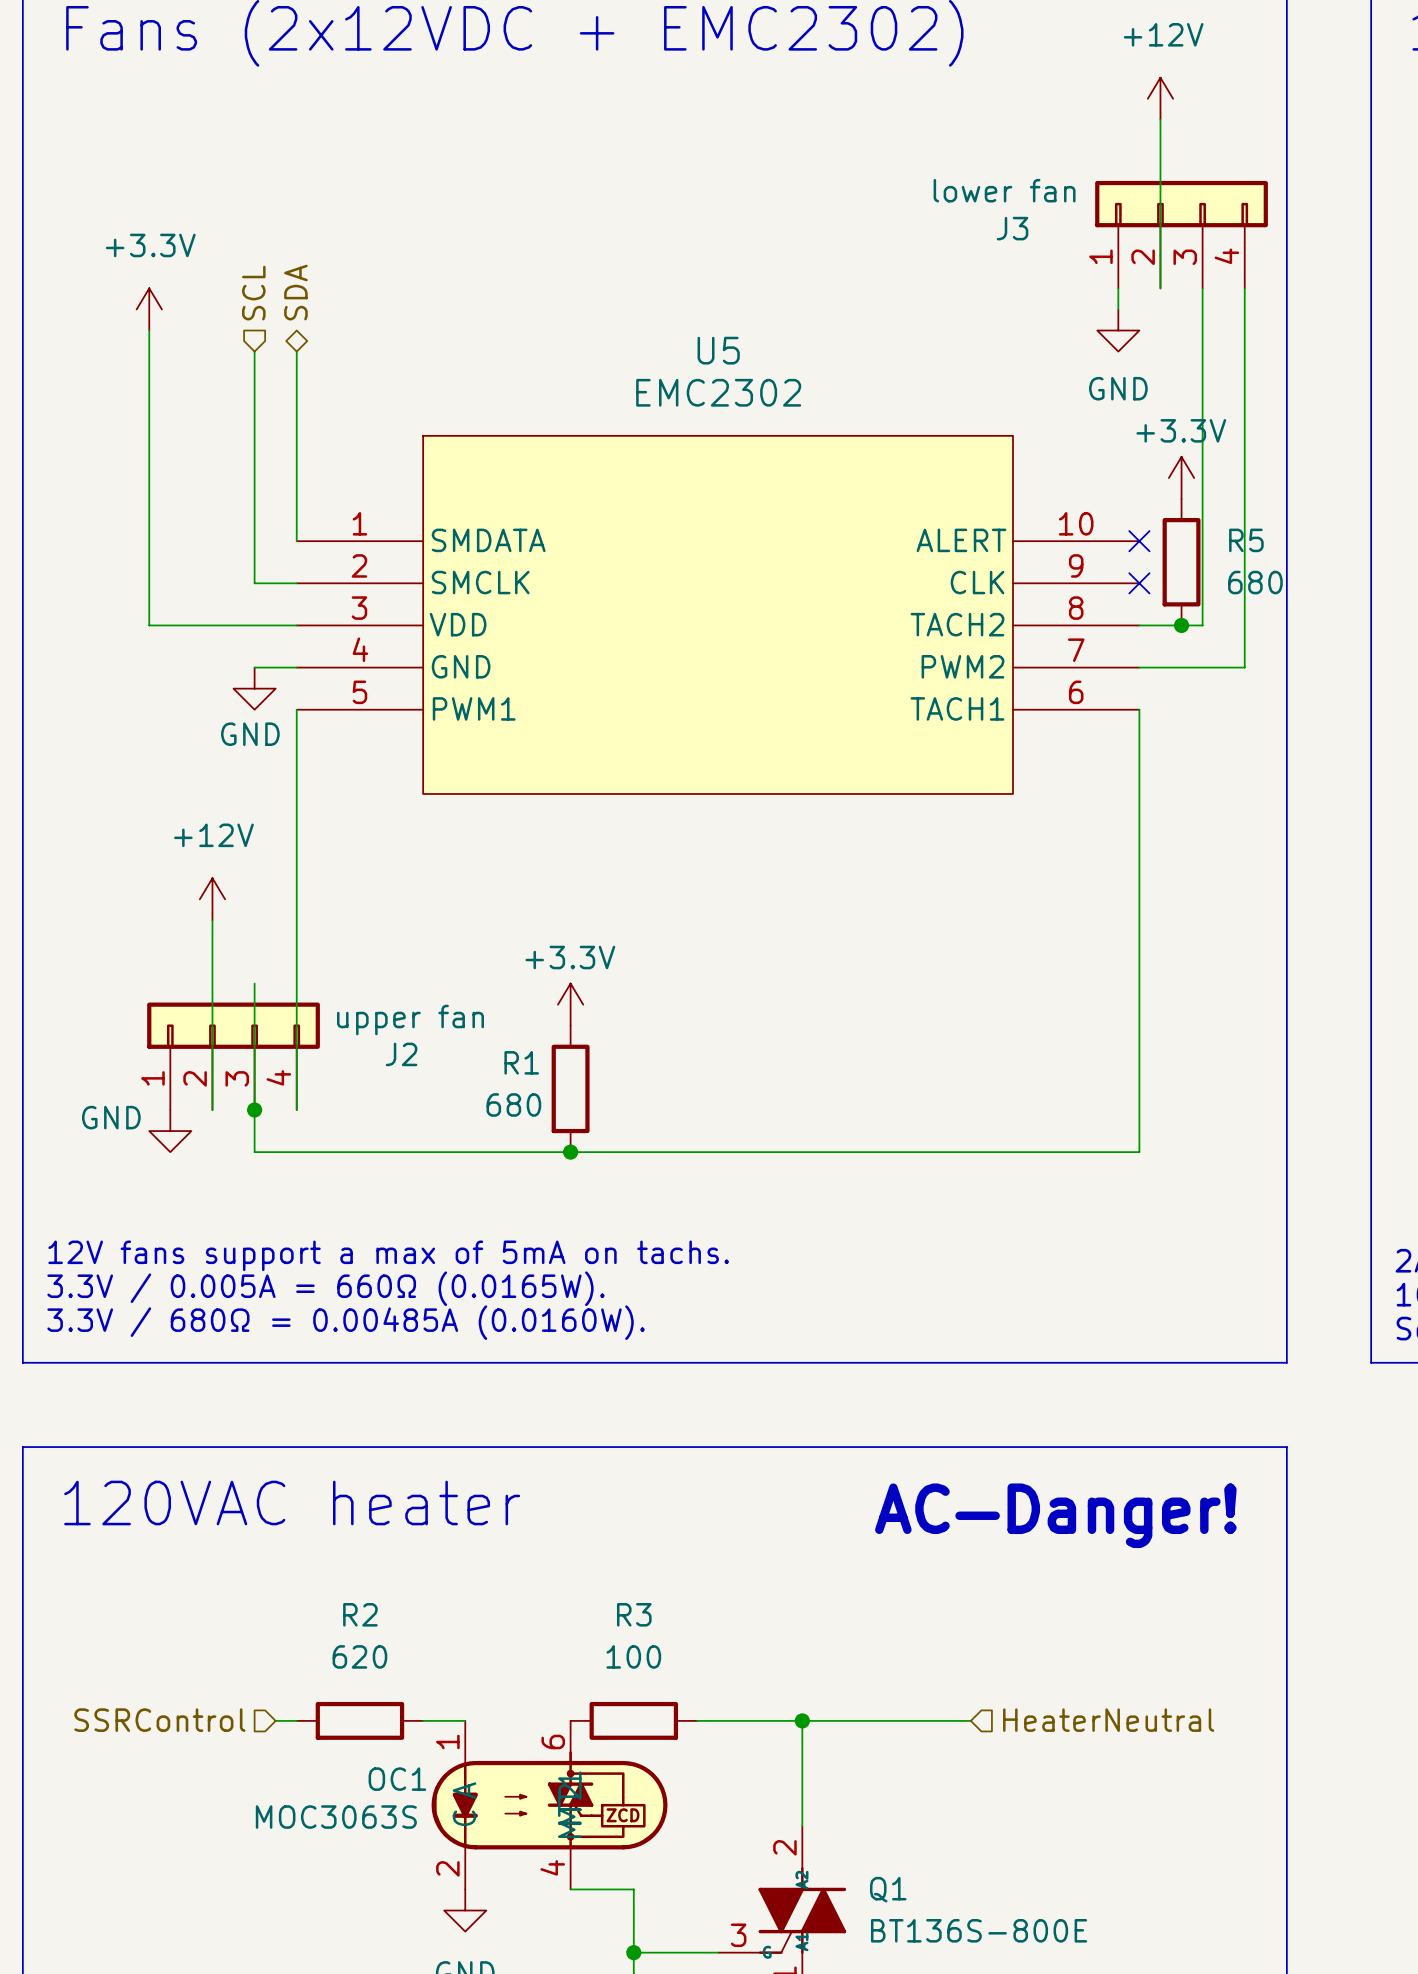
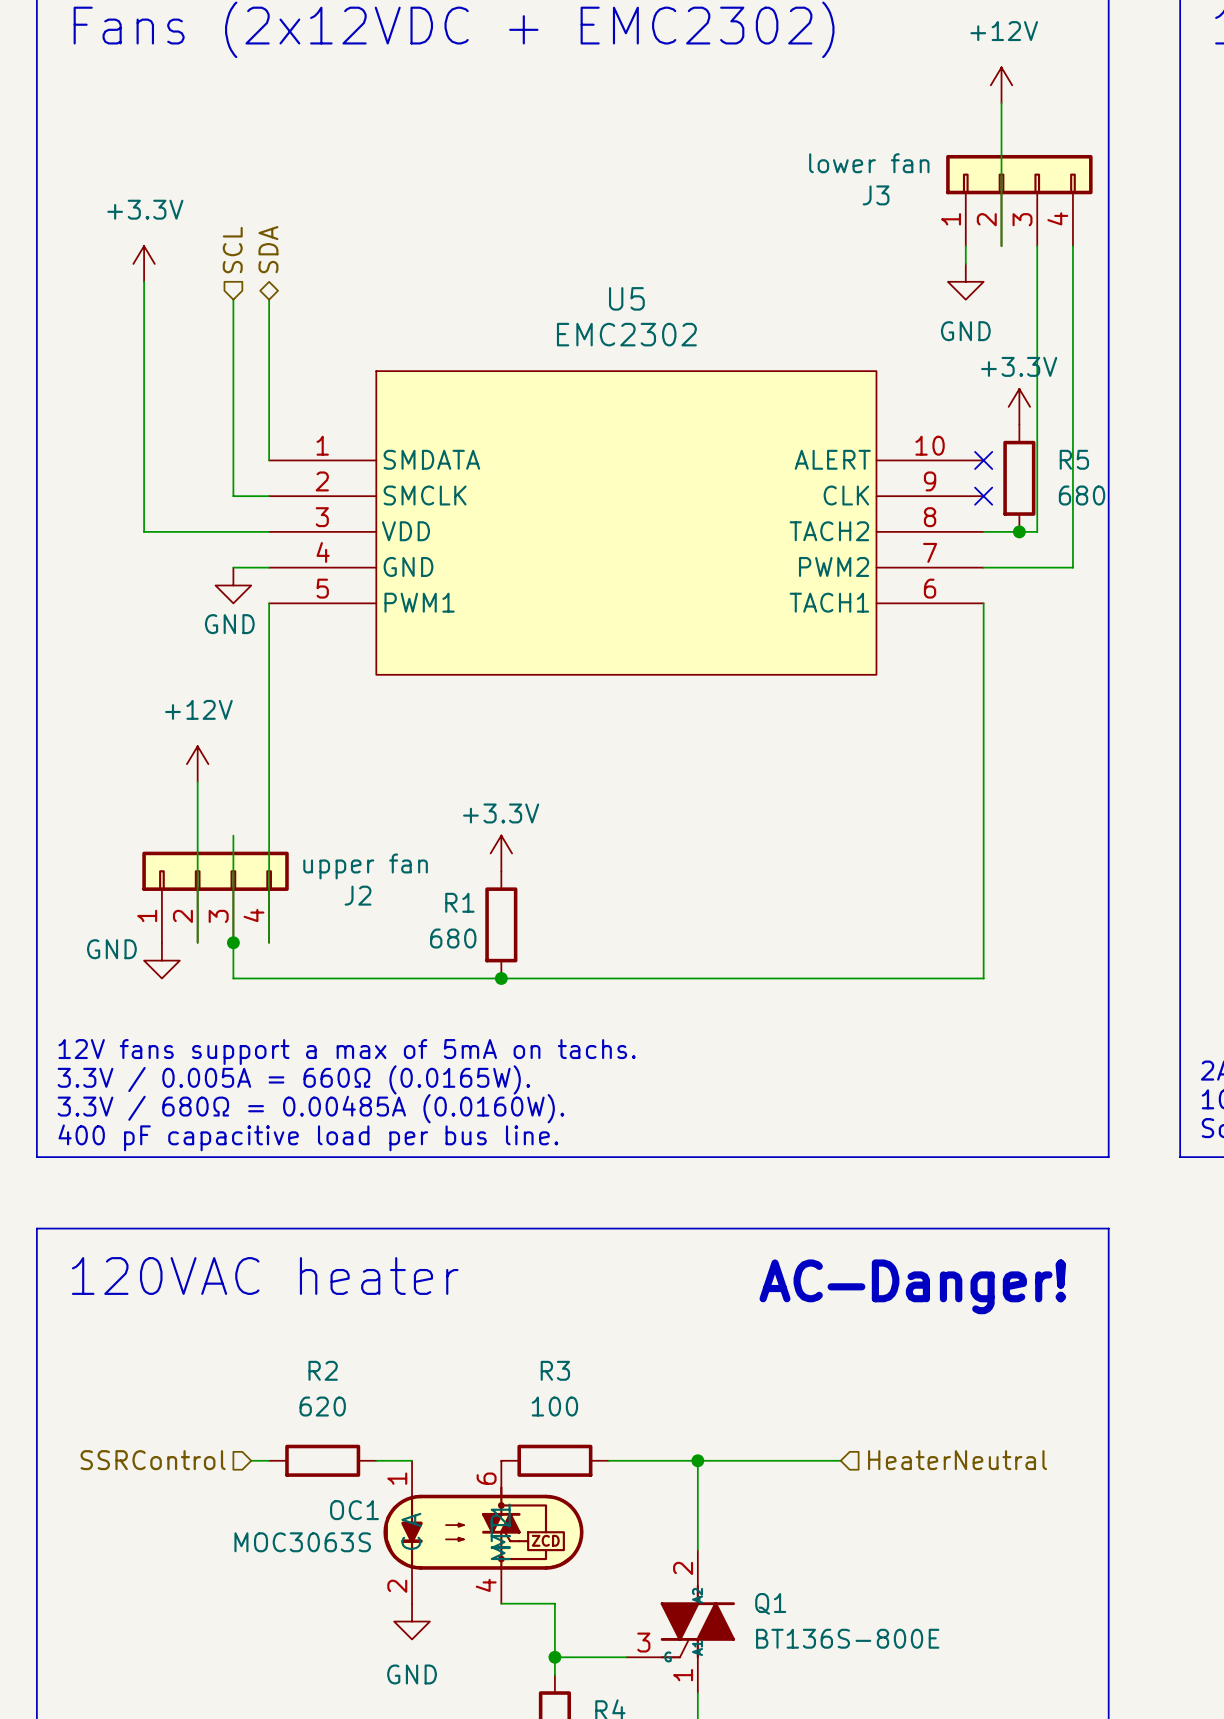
text position: 12V fans support a max of 5mA on tachs. (388, 1255) -> 12V fans support a max of 5mA on tachs. (347, 1052)
text position: 3.3V / 0.005A = 660Ω (0.0165W). (325, 1288) -> 3.3V / 0.005A = 660Ω (0.0165W). (293, 1079)
text position: 3.3V / 680Ω = 0.00485A (0.0160W). (346, 1322) -> 3.3V / 680Ω = 0.00485A (0.0160W). (310, 1108)
text: none -> 400 pF capacitive load per bus line. (308, 1137)

